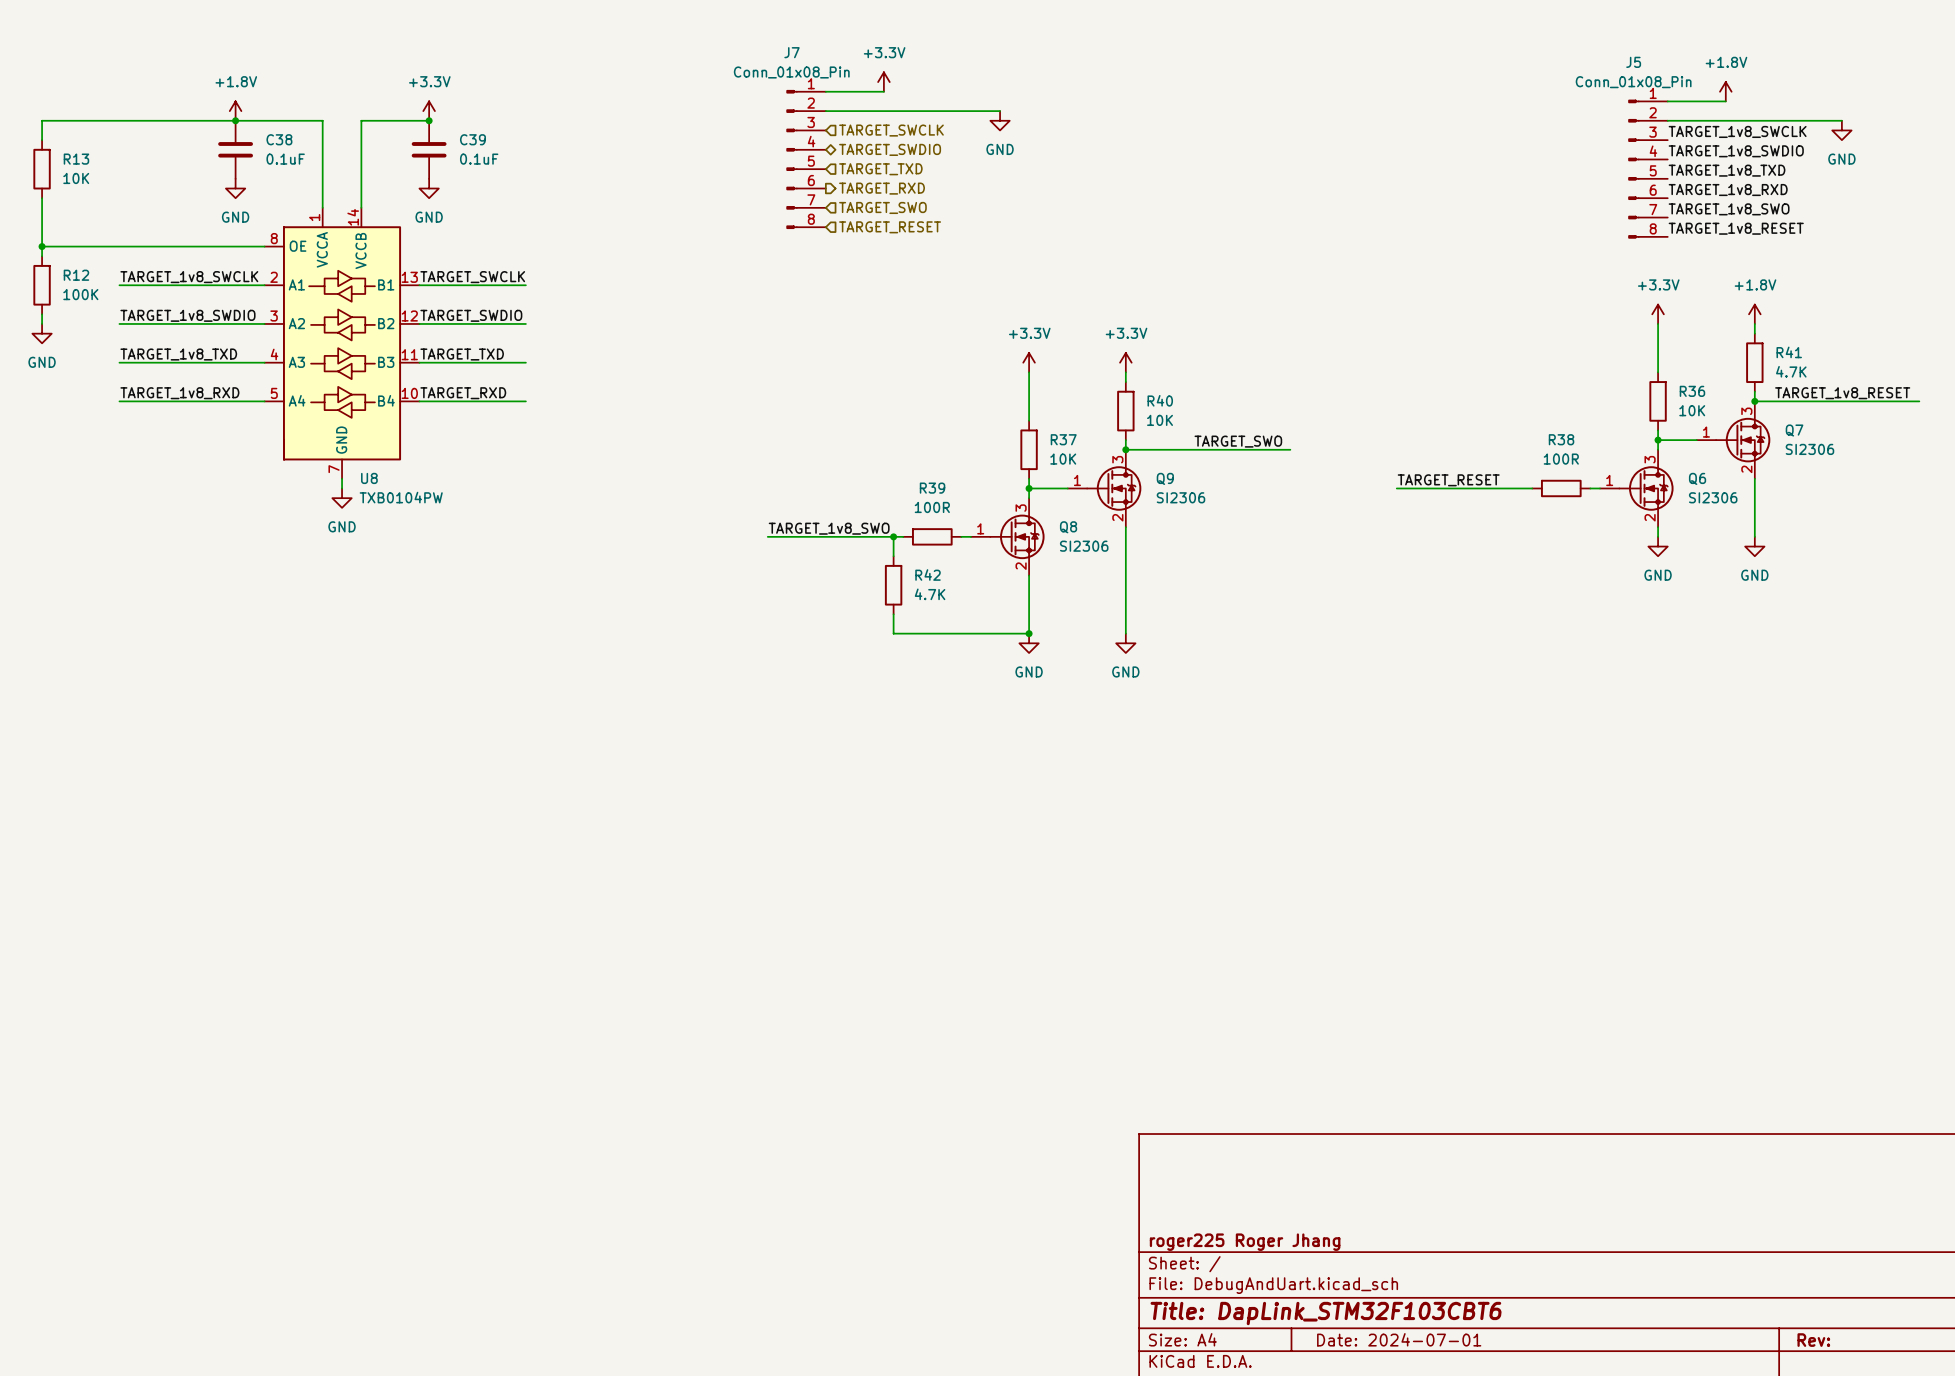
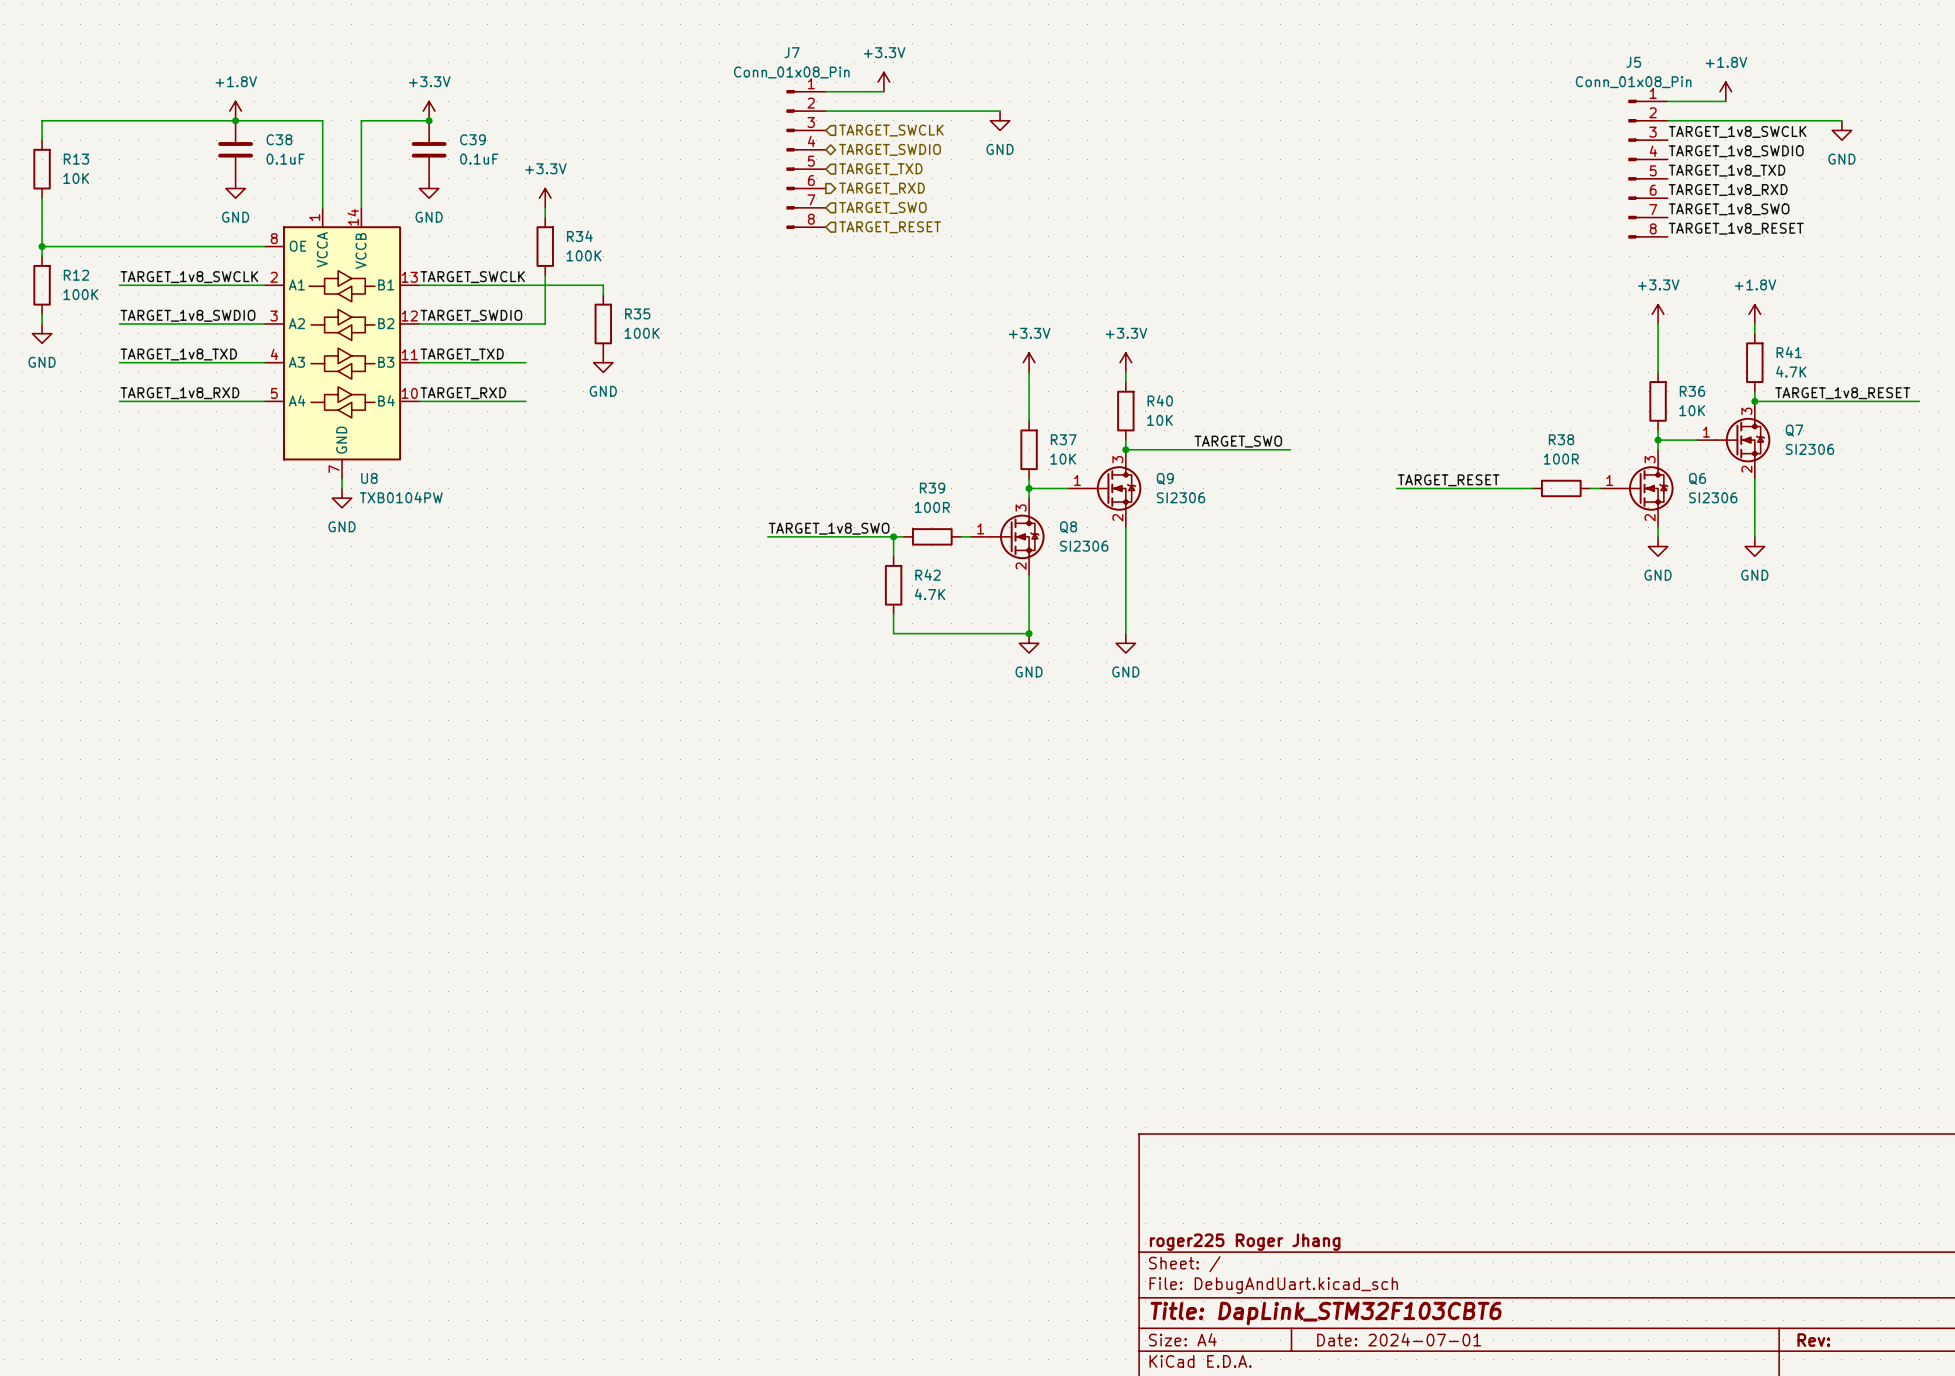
power symbol: none -> +3.3V (545, 198)
wire: none -> (545, 207) (545, 217)
R34: none -> 100K (545, 246)
wire: none -> (545, 275) (545, 323) (525, 323)
wire: none -> (525, 285) (603, 285) (603, 294)
R35: none -> 100K (603, 323)
power symbol: none -> GND (603, 362)

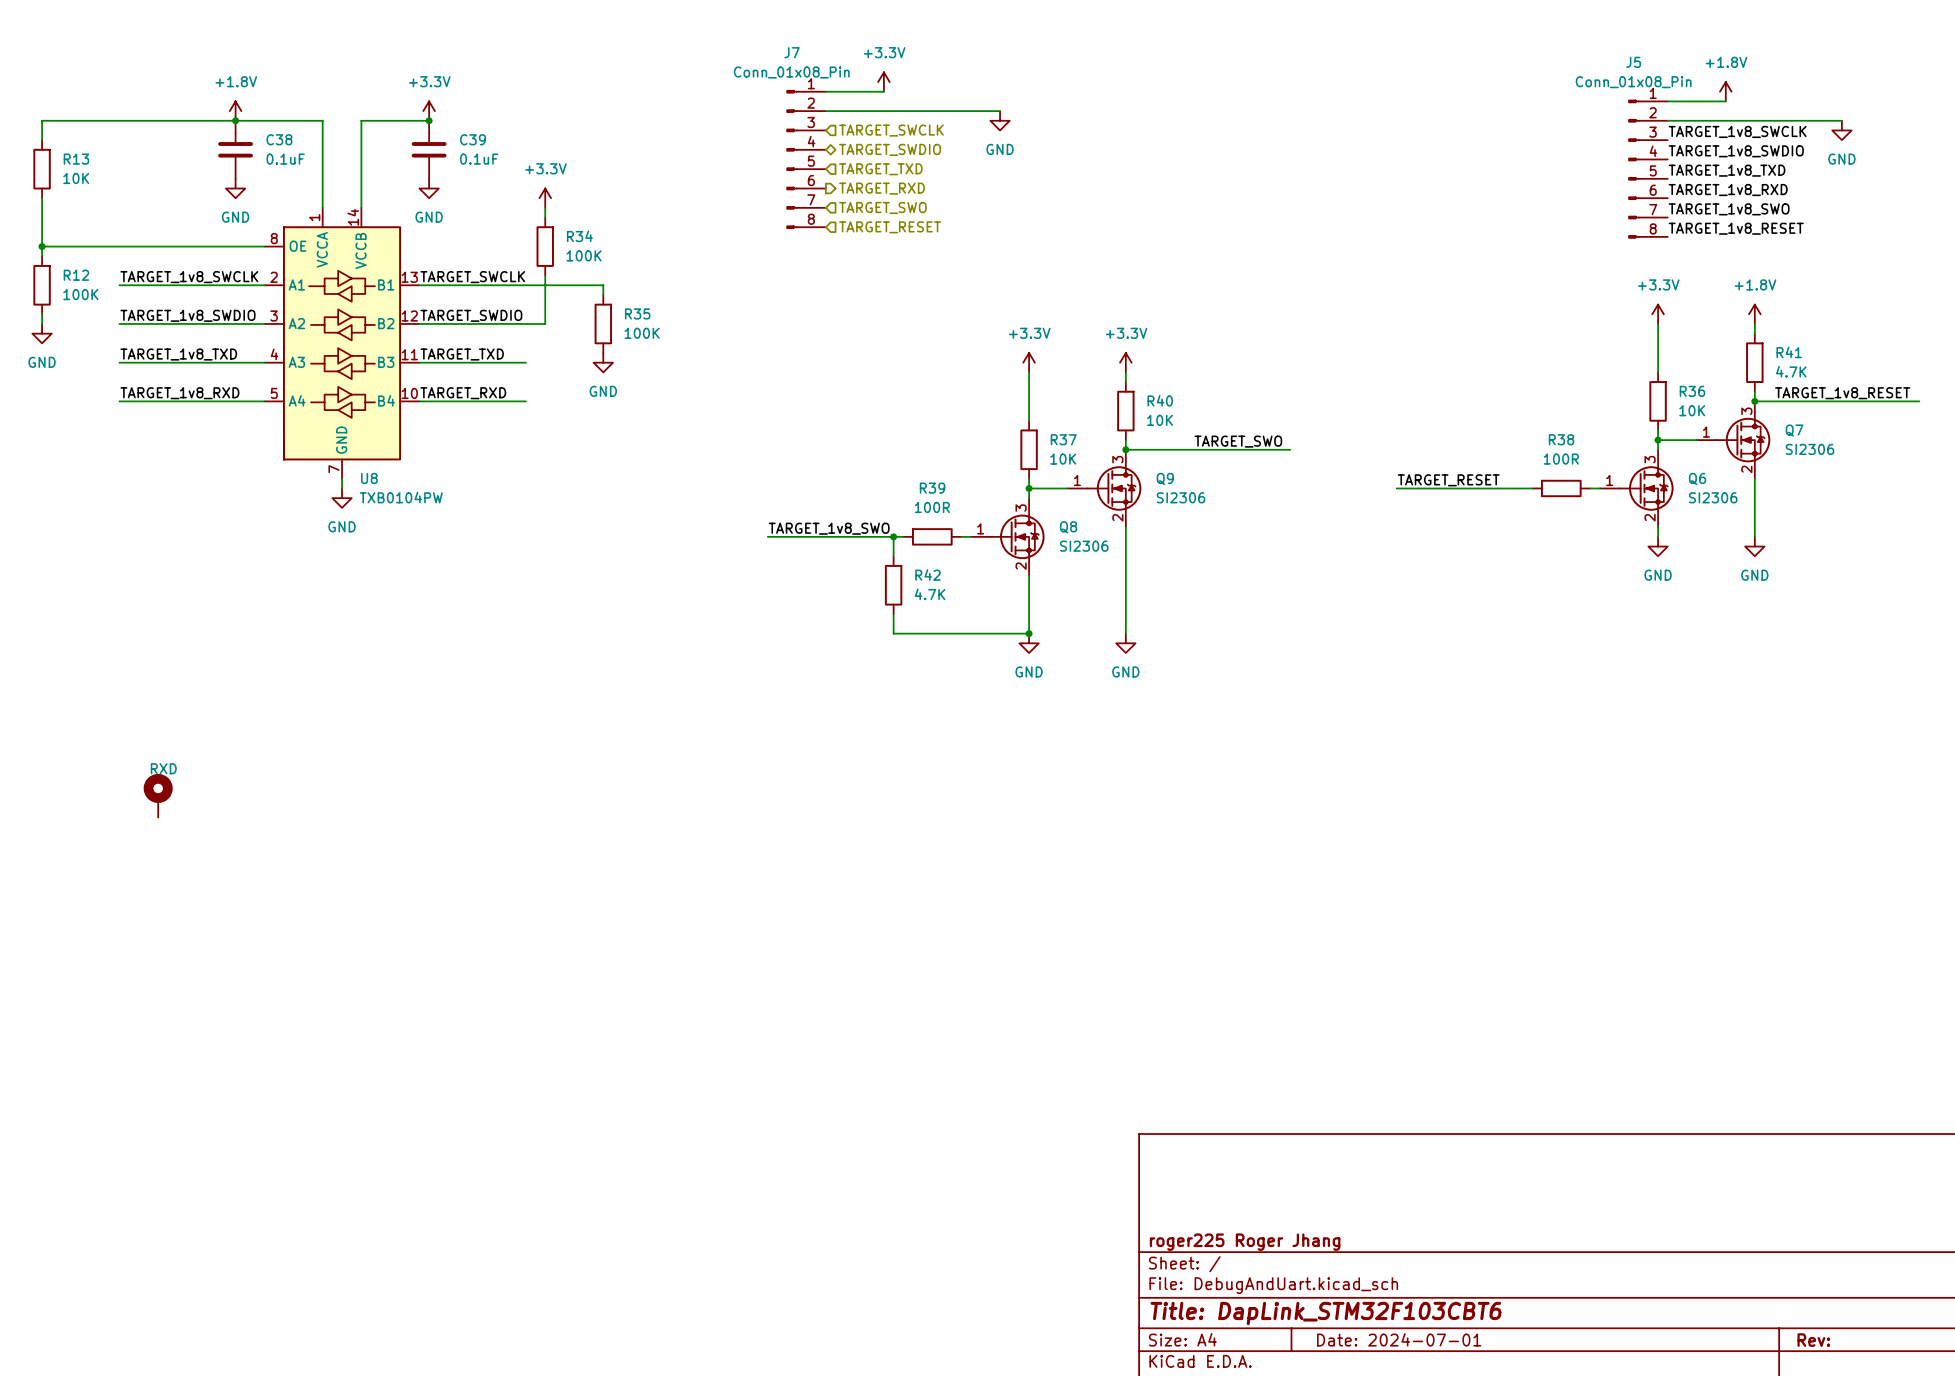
part: none -> RXD (158, 795)

